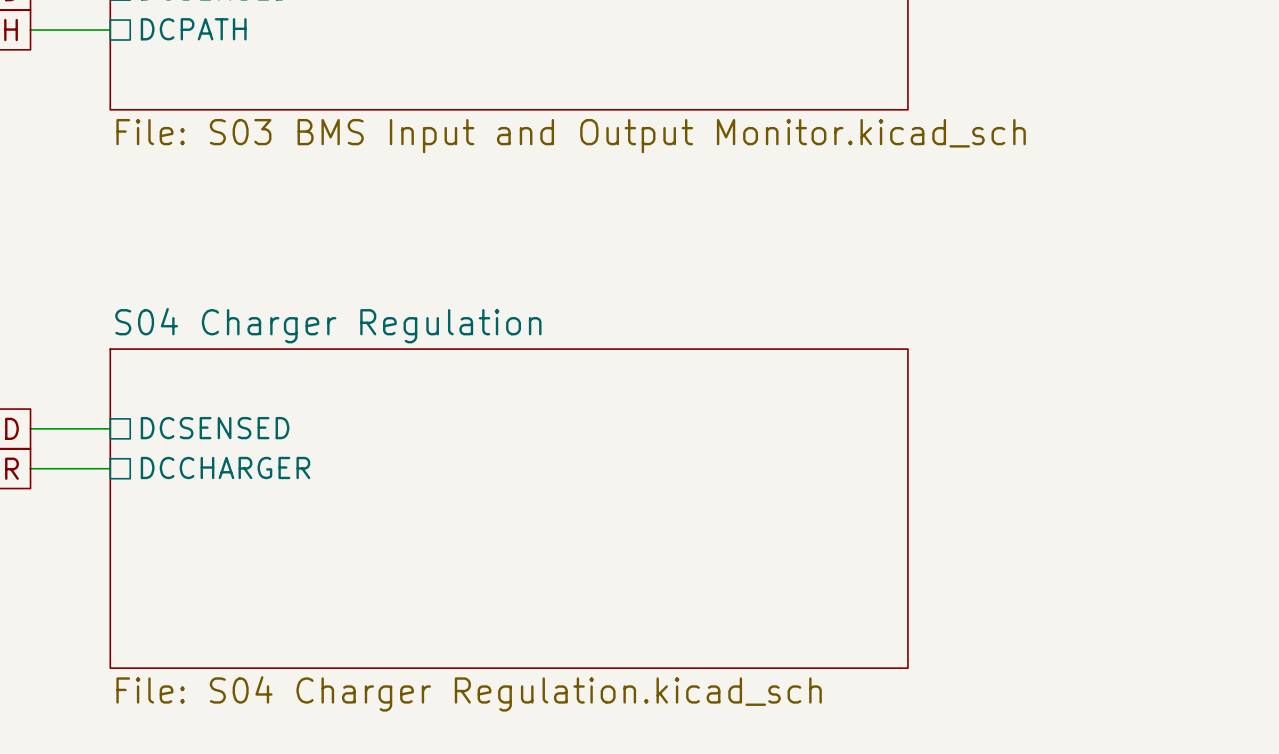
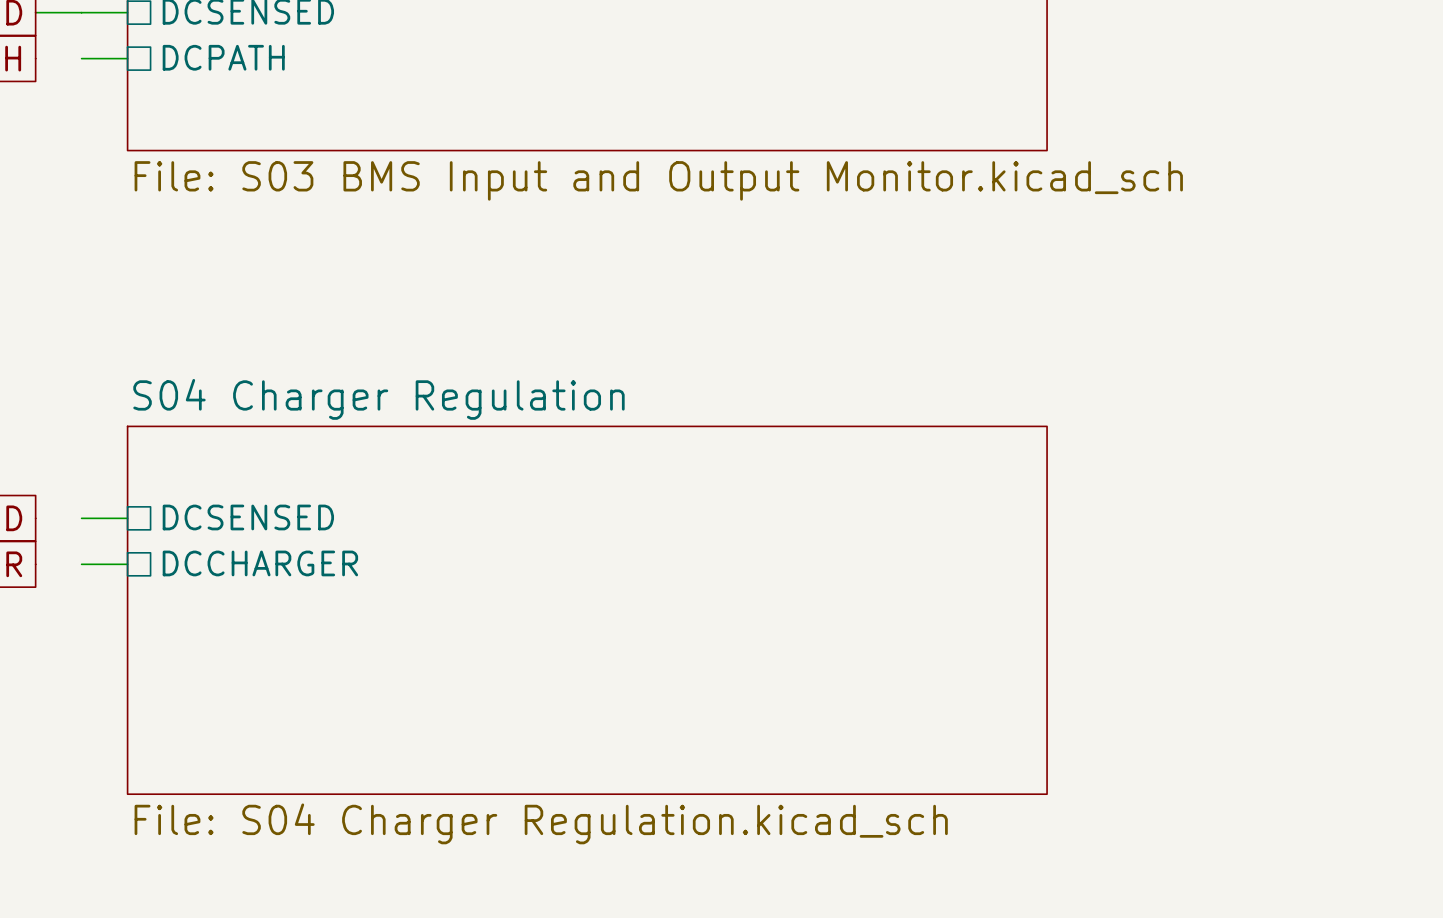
wire: (30, 30) (70, 30) -> none
wire: (30, 428) (70, 428) -> none
wire: (30, 468) (70, 468) -> none

